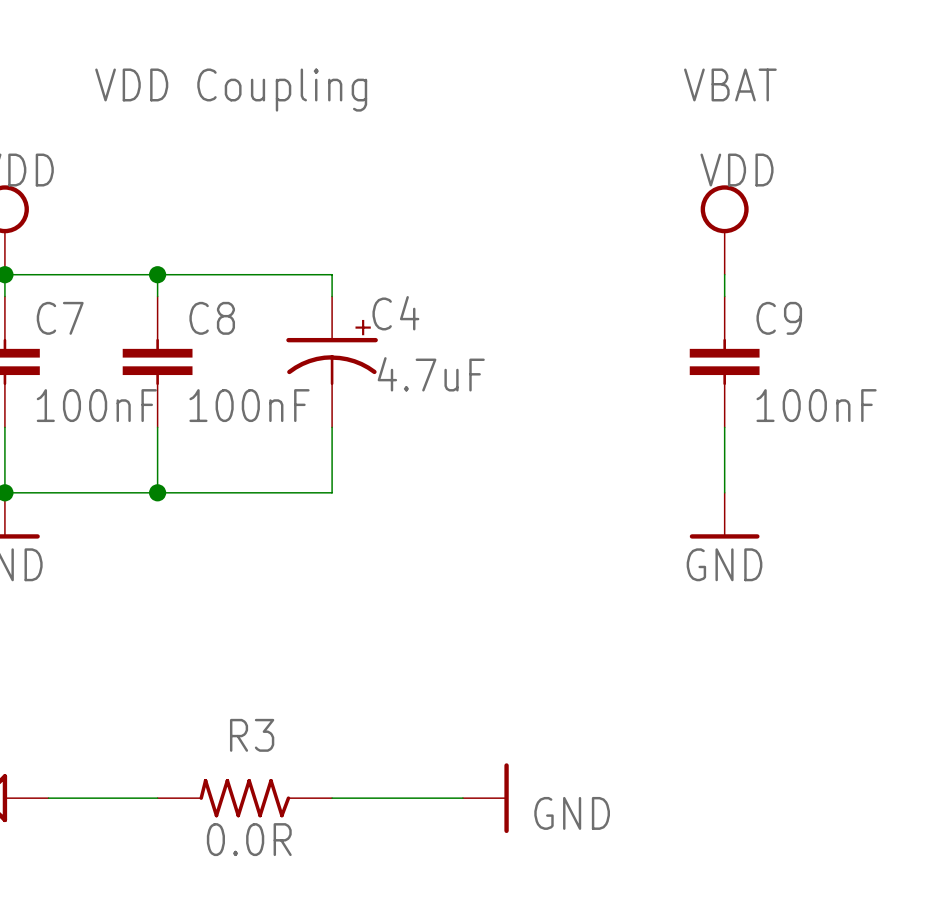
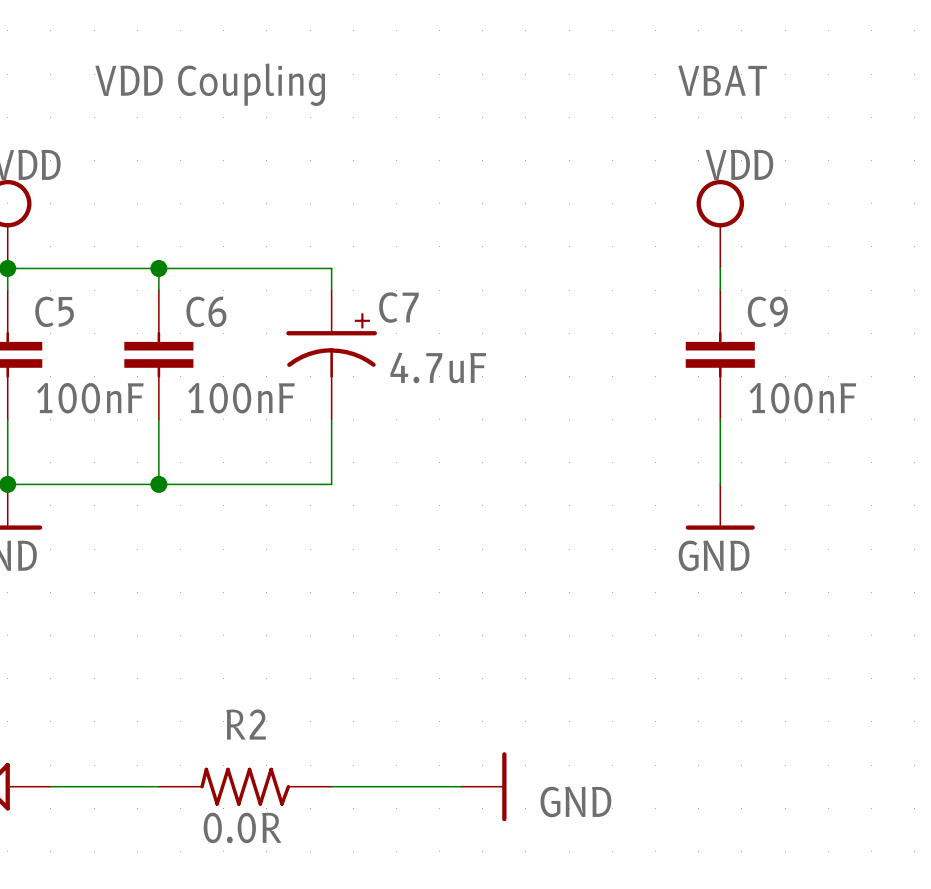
C4 name: C4 (395, 313) -> C7 (398, 307)
C7 name: C7 (60, 318) -> C5 (54, 311)
C8 name: C8 (212, 318) -> C6 (206, 311)
R3 name: R3 (252, 735) -> R2 (246, 724)

